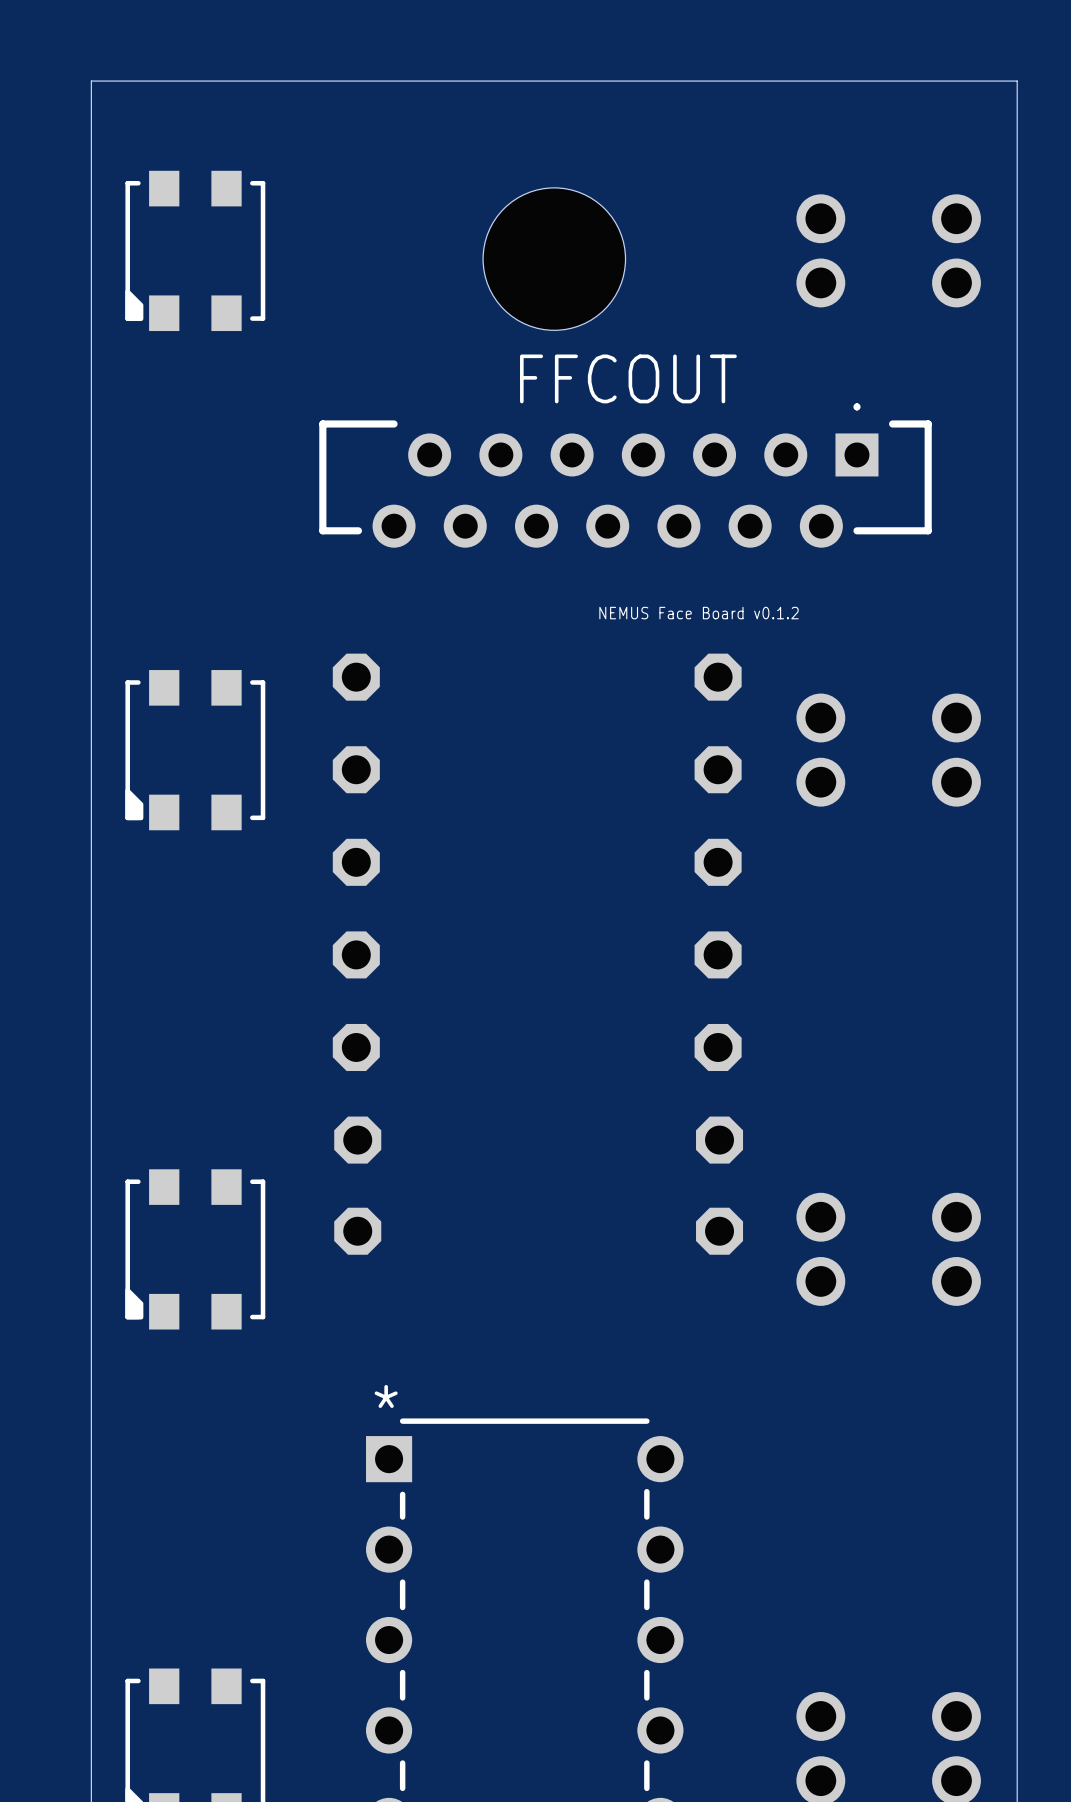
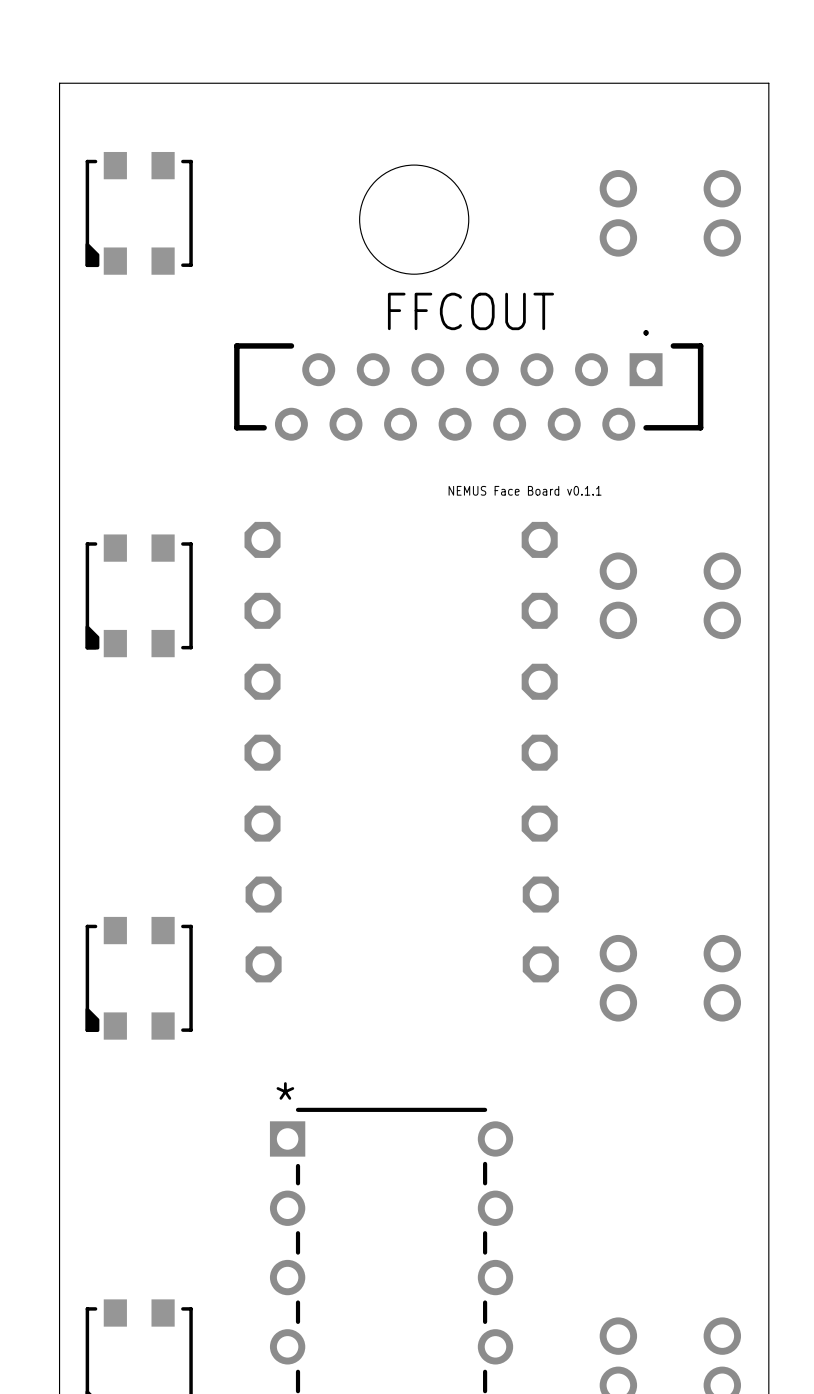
text: NEMUS Face Board v0.1.2 (699, 613) -> NEMUS Face Board v0.1.1 (525, 490)

